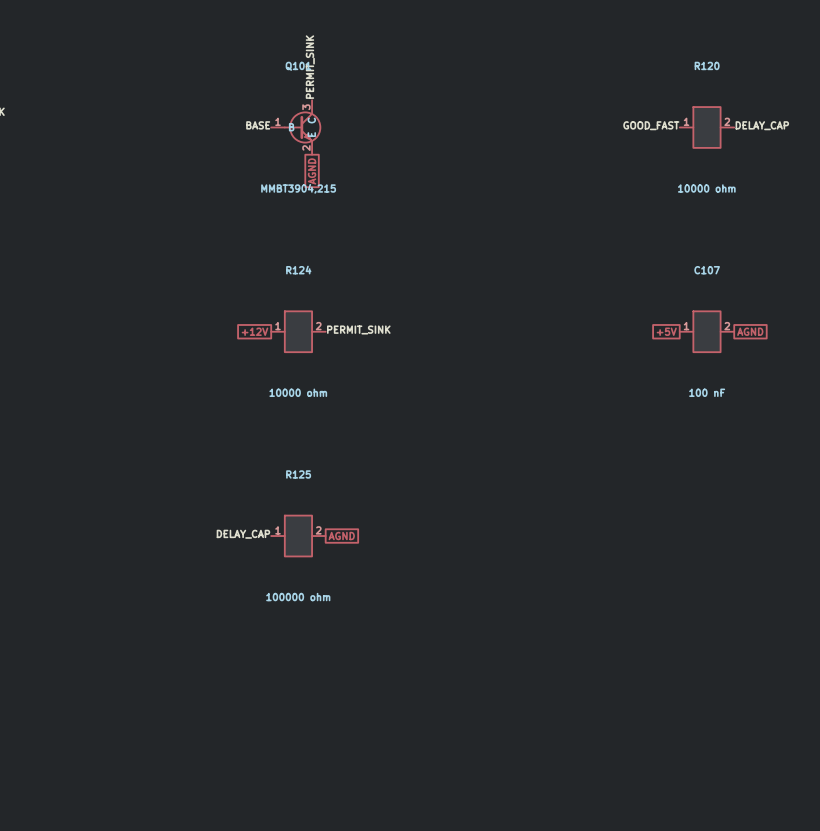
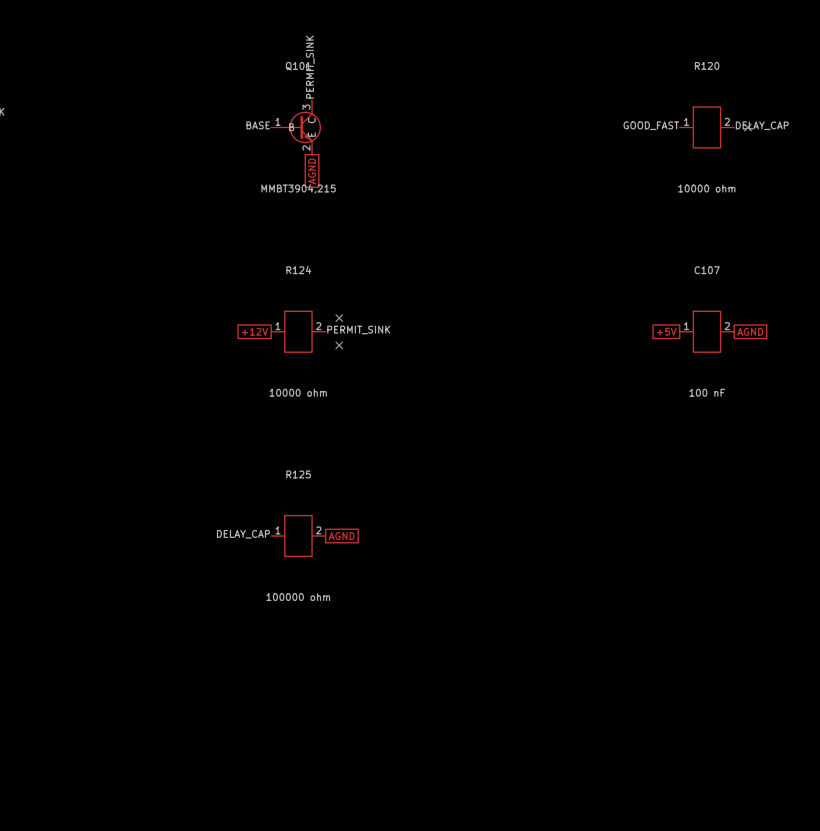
no-connect mark: none -> (747, 127)
no-connect mark: none -> (339, 318)
no-connect mark: none -> (339, 345)

